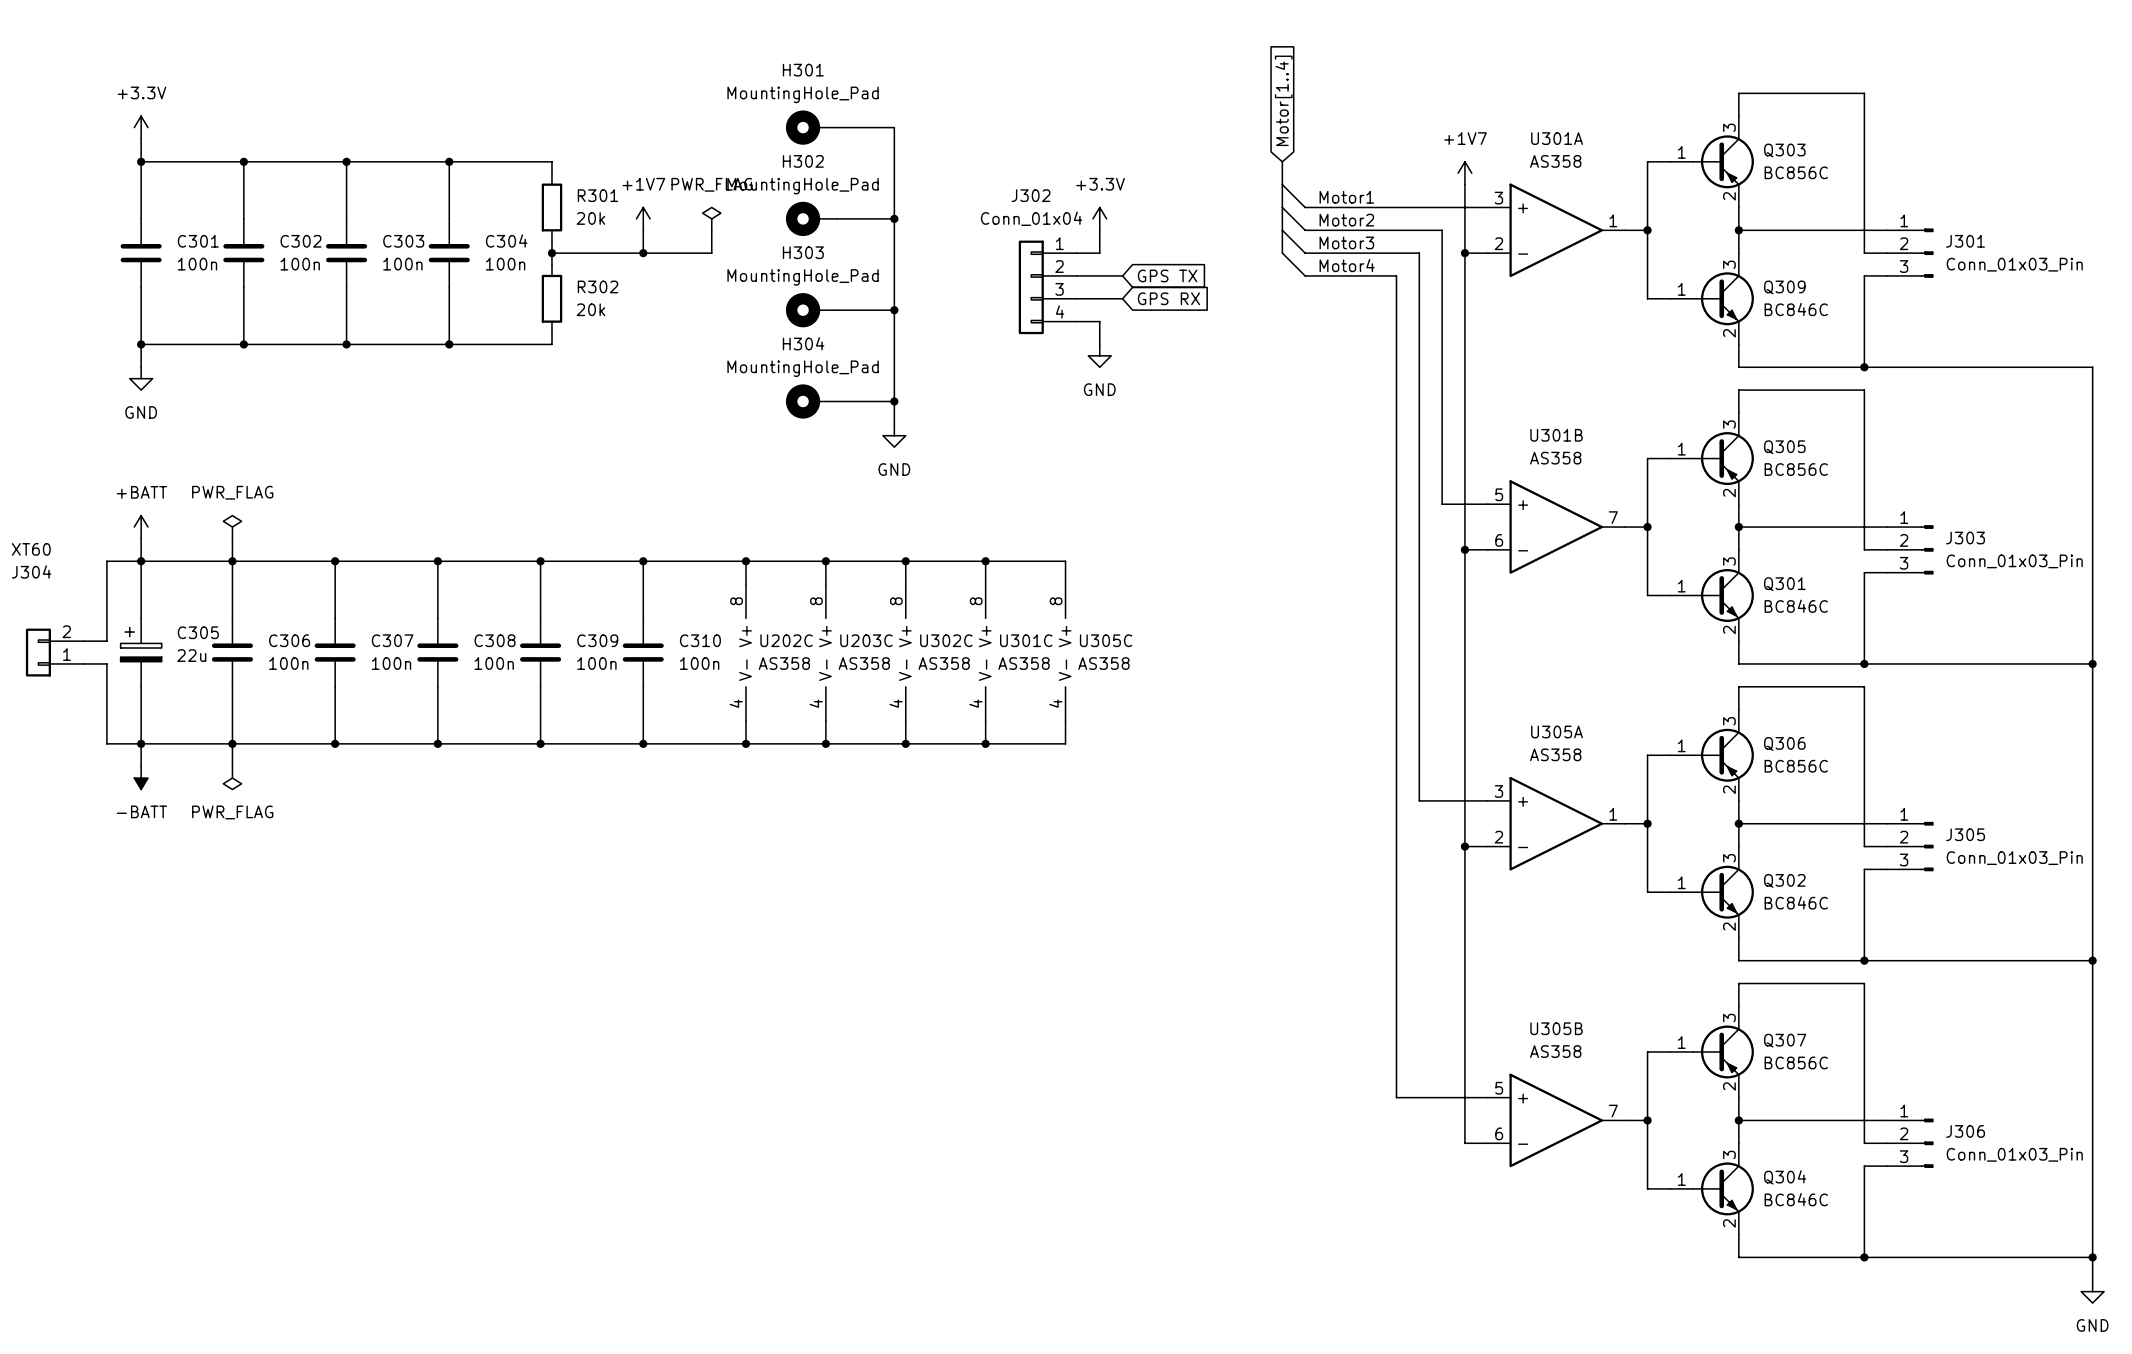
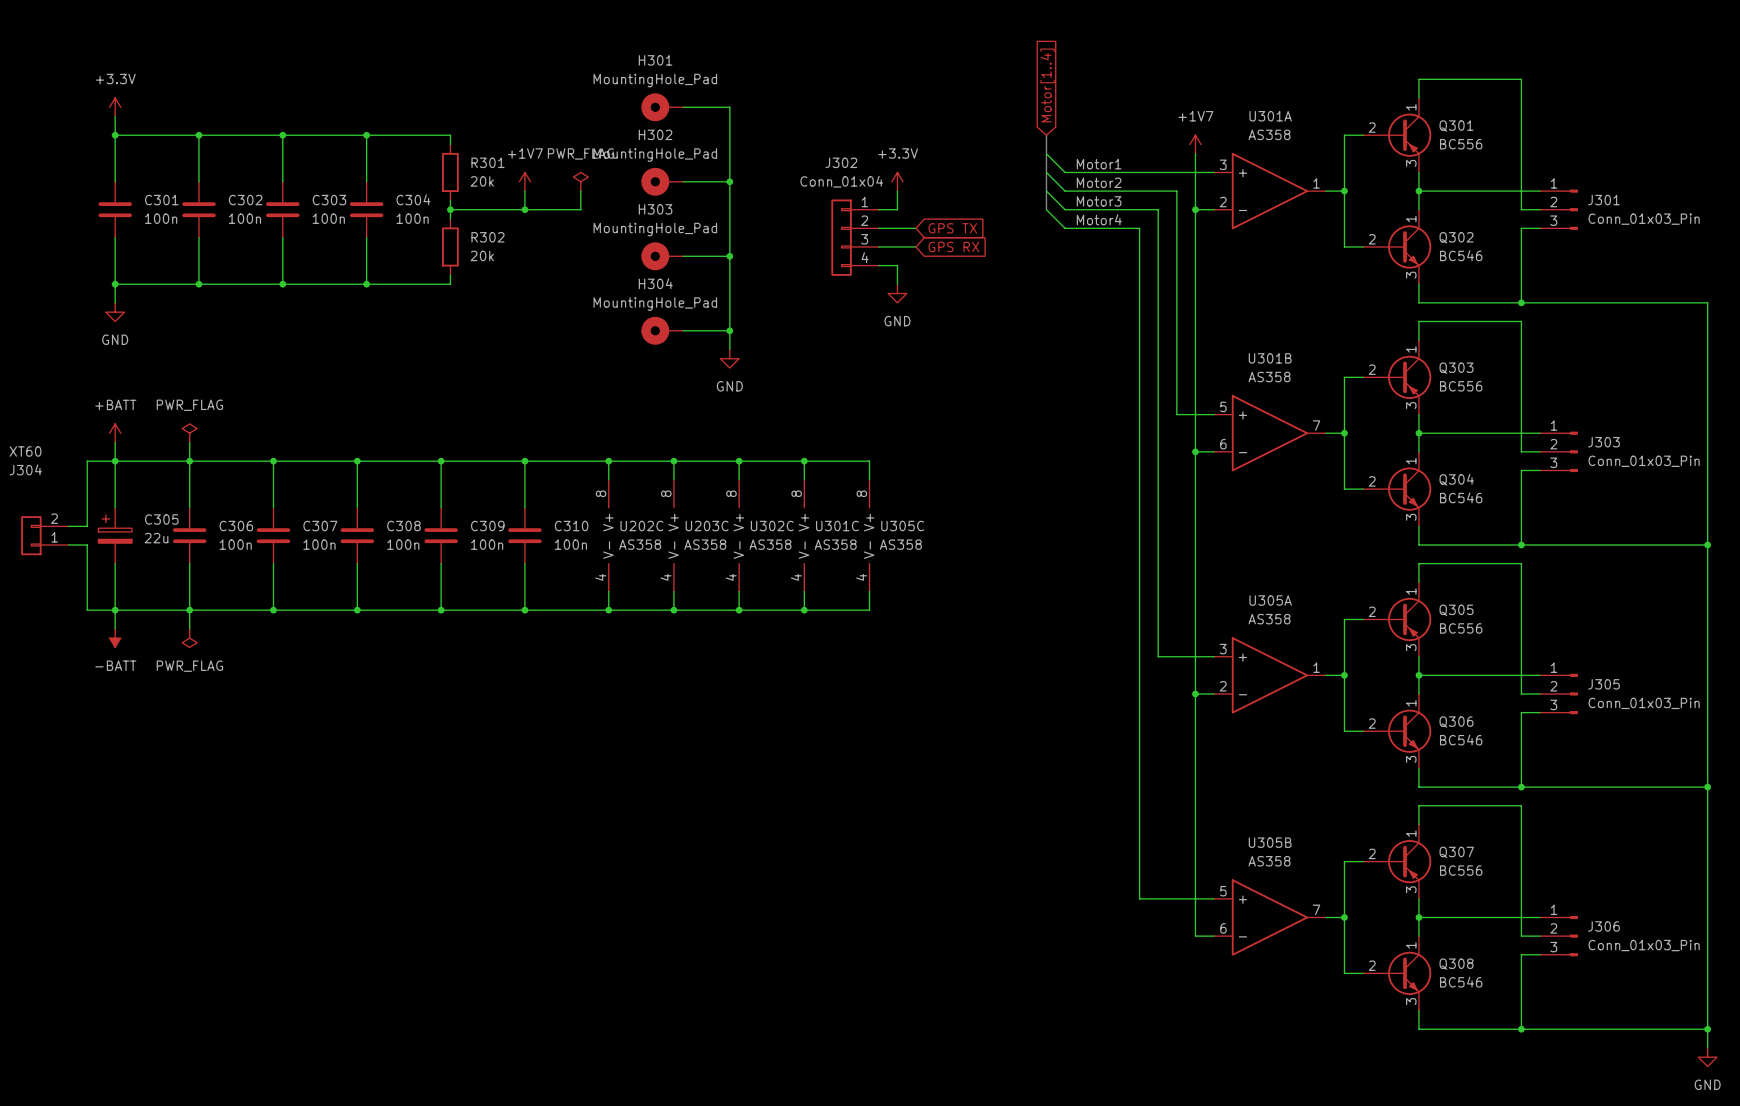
Q303 pin number: 3 (1729, 127) -> 1 (1411, 349)
Q303 pin number: 1 (1681, 152) -> 2 (1372, 369)
Q303 position: (1712, 161) -> (1397, 377)
Q303 value: BC856C (1796, 172) -> BC556 (1461, 386)
Q303 pin number: 2 (1729, 196) -> 3 (1411, 405)
Q309: BC846C (1712, 298) -> none
Q305 pin number: 3 (1729, 424) -> 1 (1411, 591)
Q305 pin number: 1 (1681, 449) -> 2 (1372, 611)
Q305 position: (1712, 458) -> (1397, 619)
Q305 value: BC856C (1796, 469) -> BC556 (1461, 628)
Q305 pin number: 2 (1729, 493) -> 3 (1411, 647)
Q301 symbol: [1670, 549, 1754, 642] -> [1363, 97, 1432, 173]
Q301 value: BC846C (1796, 606) -> BC556 (1461, 144)
Q306 symbol: [1670, 709, 1754, 801] -> [1363, 693, 1432, 769]
Q306 value: BC856C (1796, 766) -> BC546 (1461, 739)
Q302 pin number: 3 (1729, 858) -> 1 (1411, 219)
Q302 pin number: 1 (1681, 882) -> 2 (1372, 239)
Q302 position: (1712, 892) -> (1397, 246)
Q302 value: BC846C (1796, 902) -> BC546 (1461, 255)
Q302 pin number: 2 (1729, 926) -> 3 (1411, 275)
Q307 pin number: 3 (1729, 1018) -> 1 (1411, 833)
Q307 pin number: 1 (1681, 1042) -> 2 (1372, 853)
Q307 value: BC856C (1796, 1062) -> BC556 (1461, 870)
Q307 pin number: 2 (1729, 1086) -> 3 (1411, 889)
Q304 pin number: 3 (1729, 1154) -> 1 (1411, 461)
Q304 pin number: 1 (1681, 1179) -> 2 (1372, 481)
Q304 position: (1712, 1188) -> (1397, 489)
Q308: none -> BC546 (1397, 973)
Q304 value: BC846C (1796, 1199) -> BC546 (1461, 497)
Q304 pin number: 2 (1729, 1223) -> 3 (1411, 517)

